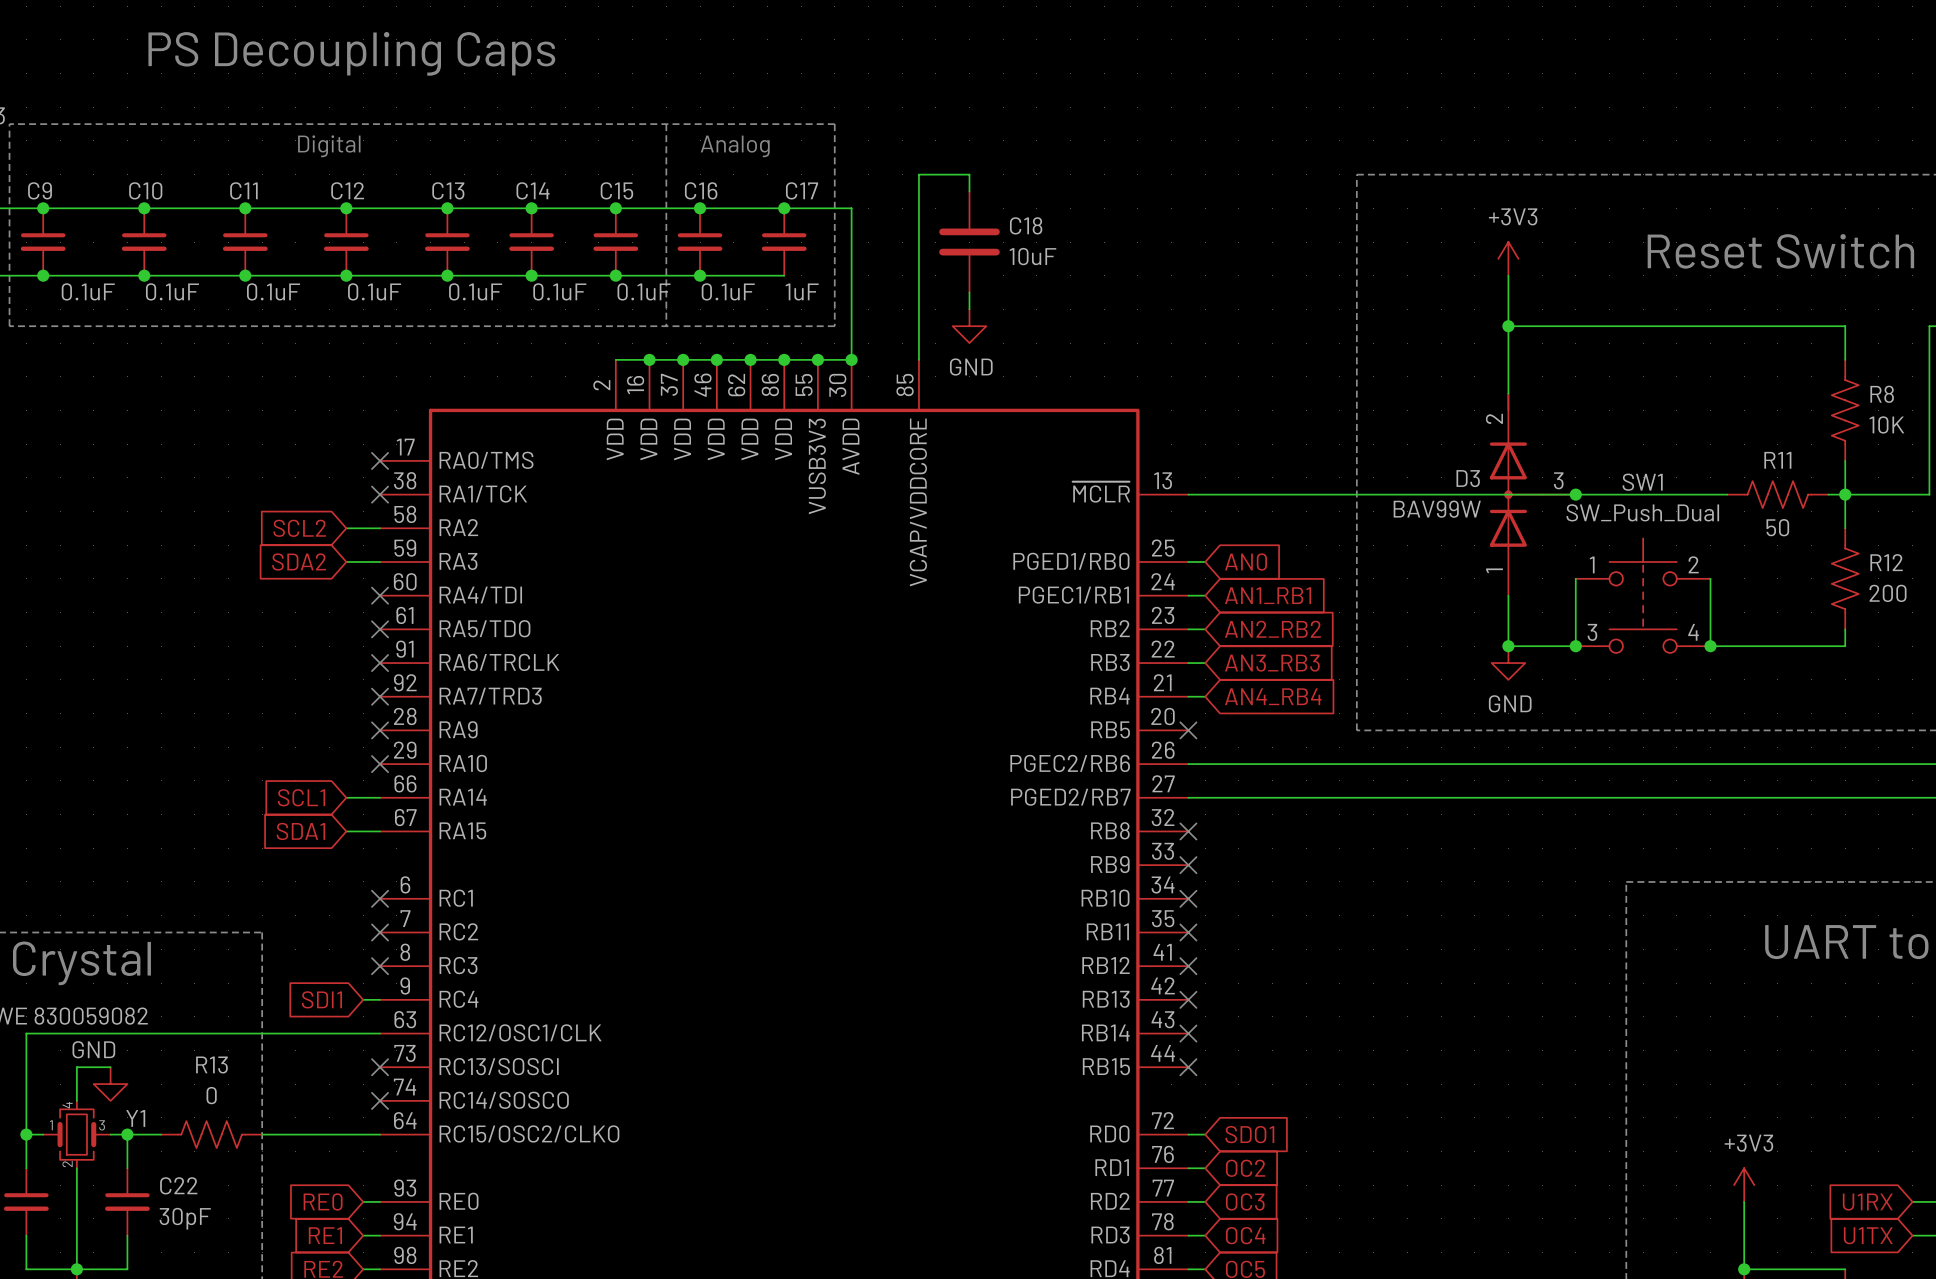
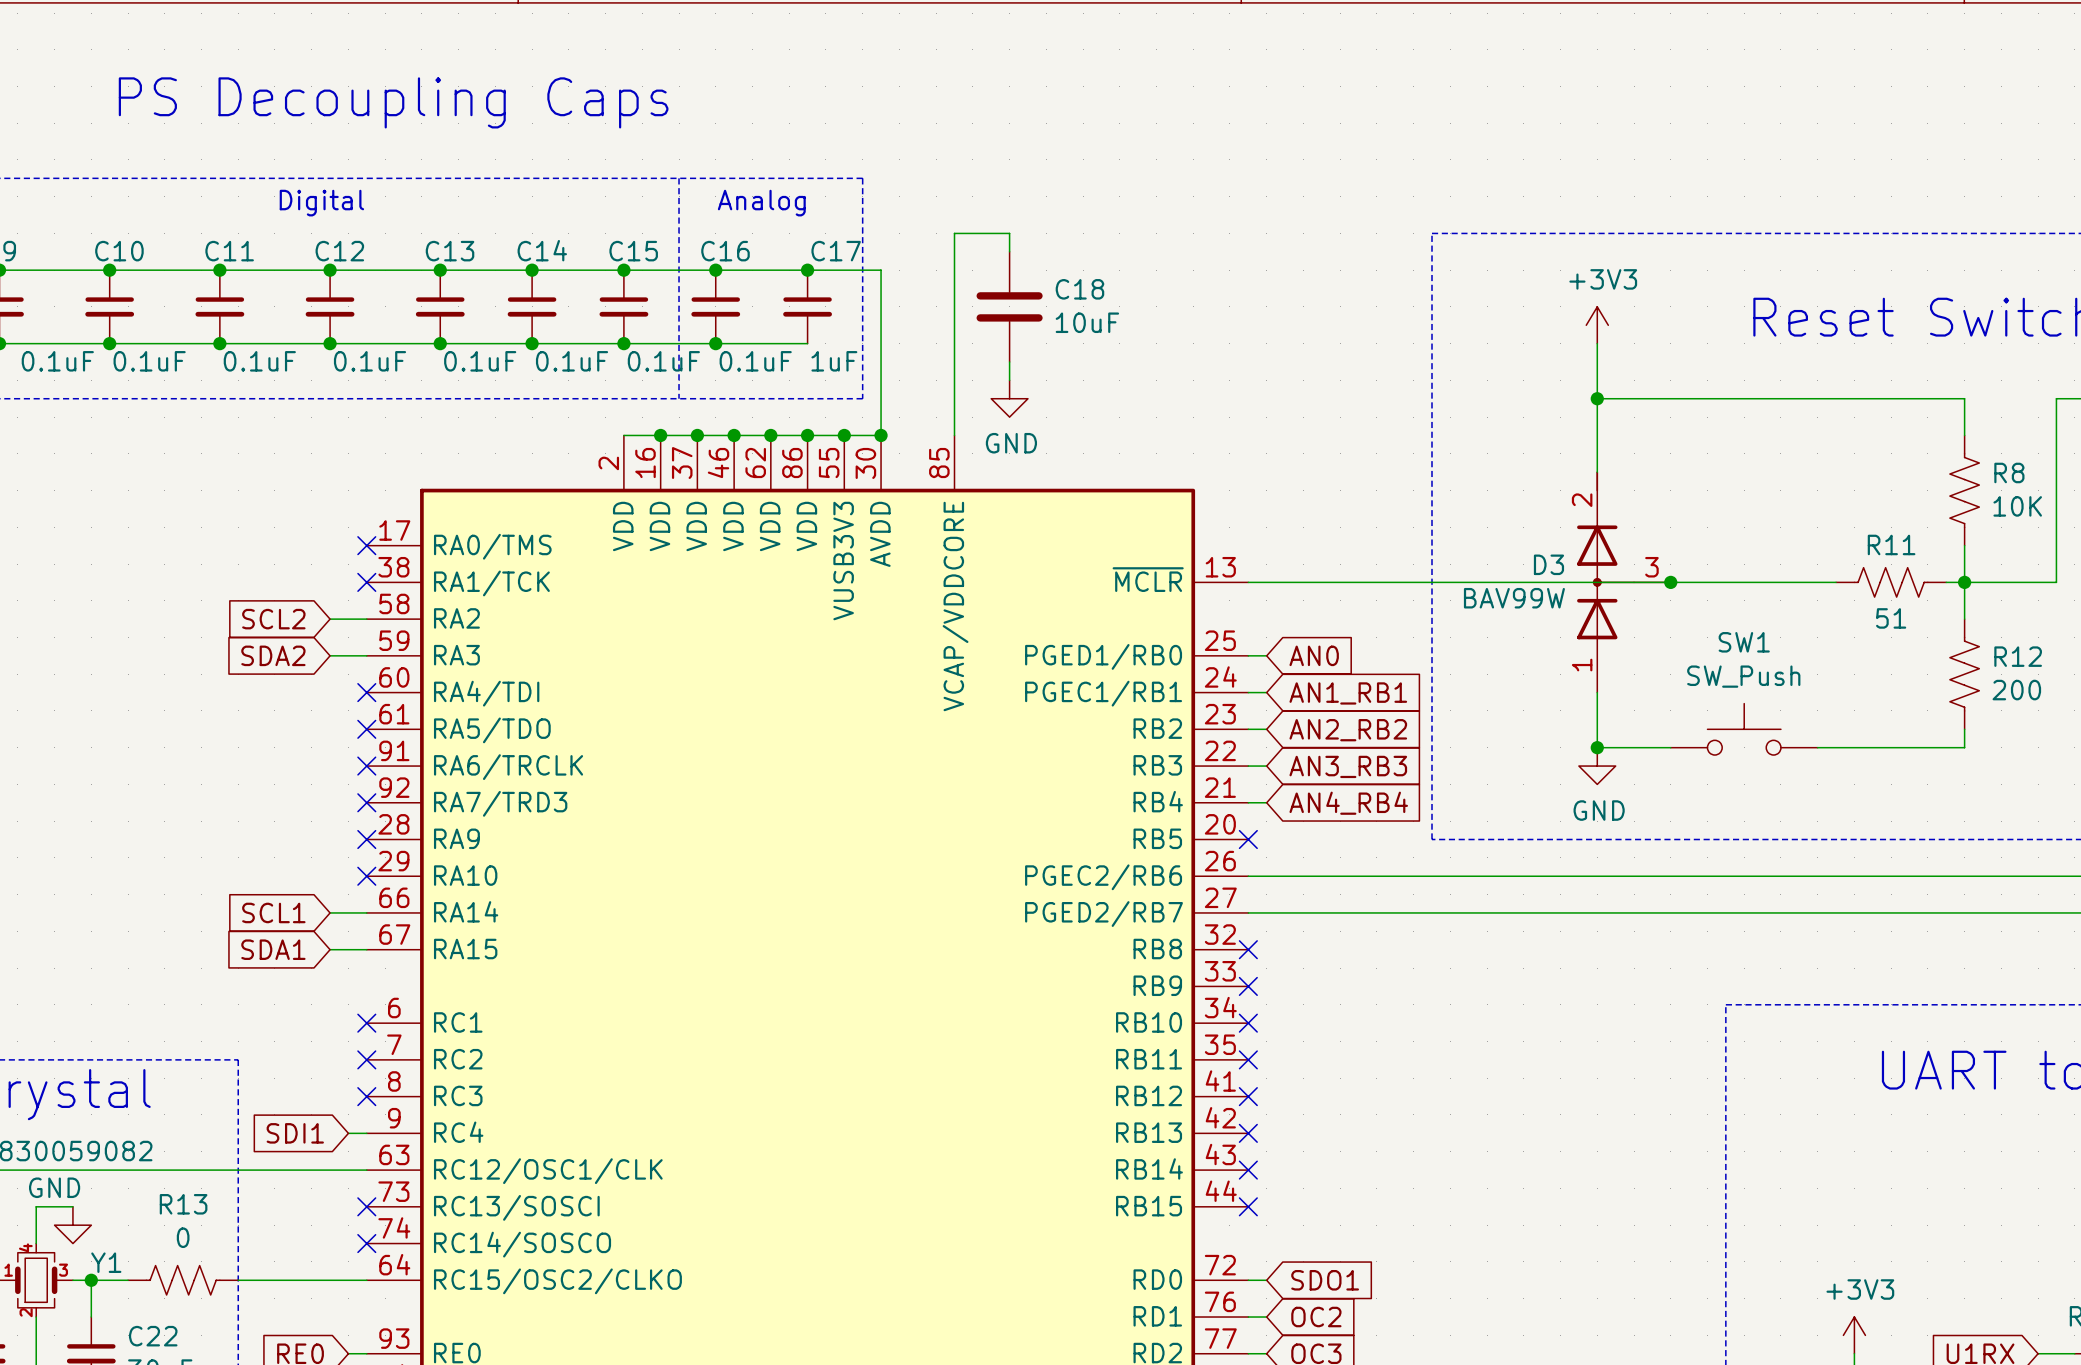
SW1 name position: SW1 (1642, 482) -> SW1 (1744, 642)
SW1 value: SW_Push_Dual (1642, 512) -> SW_Push (1743, 676)
R11 value: 50 (1777, 527) -> 51 (1891, 618)
SW1 symbol: [1575, 538, 1711, 653] -> [1670, 703, 1818, 756]
wire: (1575, 578) (1575, 646) -> none
wire: (1710, 578) (1710, 646) -> none
junction: (1575, 646) -> none
junction: (1710, 646) -> none

